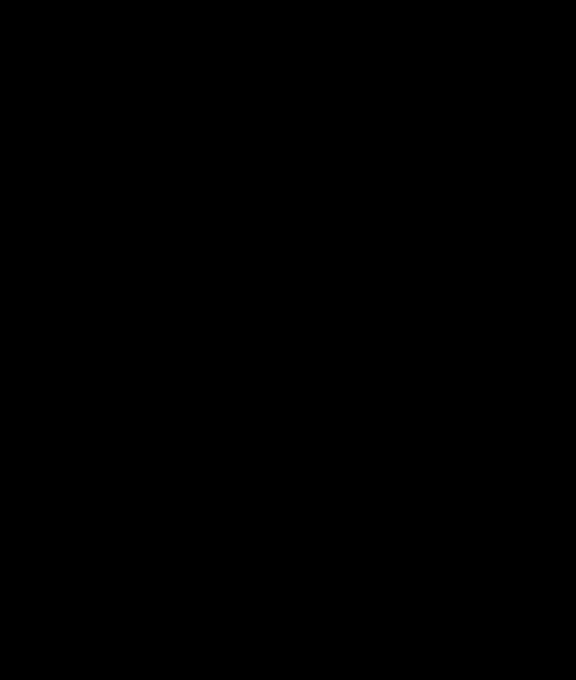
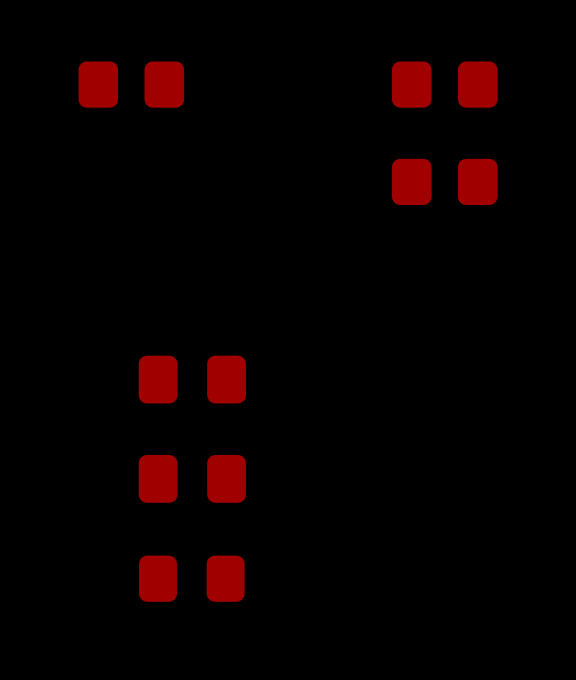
part: none -> (131, 84)
part: none -> (444, 84)
part: none -> (444, 181)
part: none -> (192, 379)
part: none -> (192, 478)
part: none -> (191, 578)

